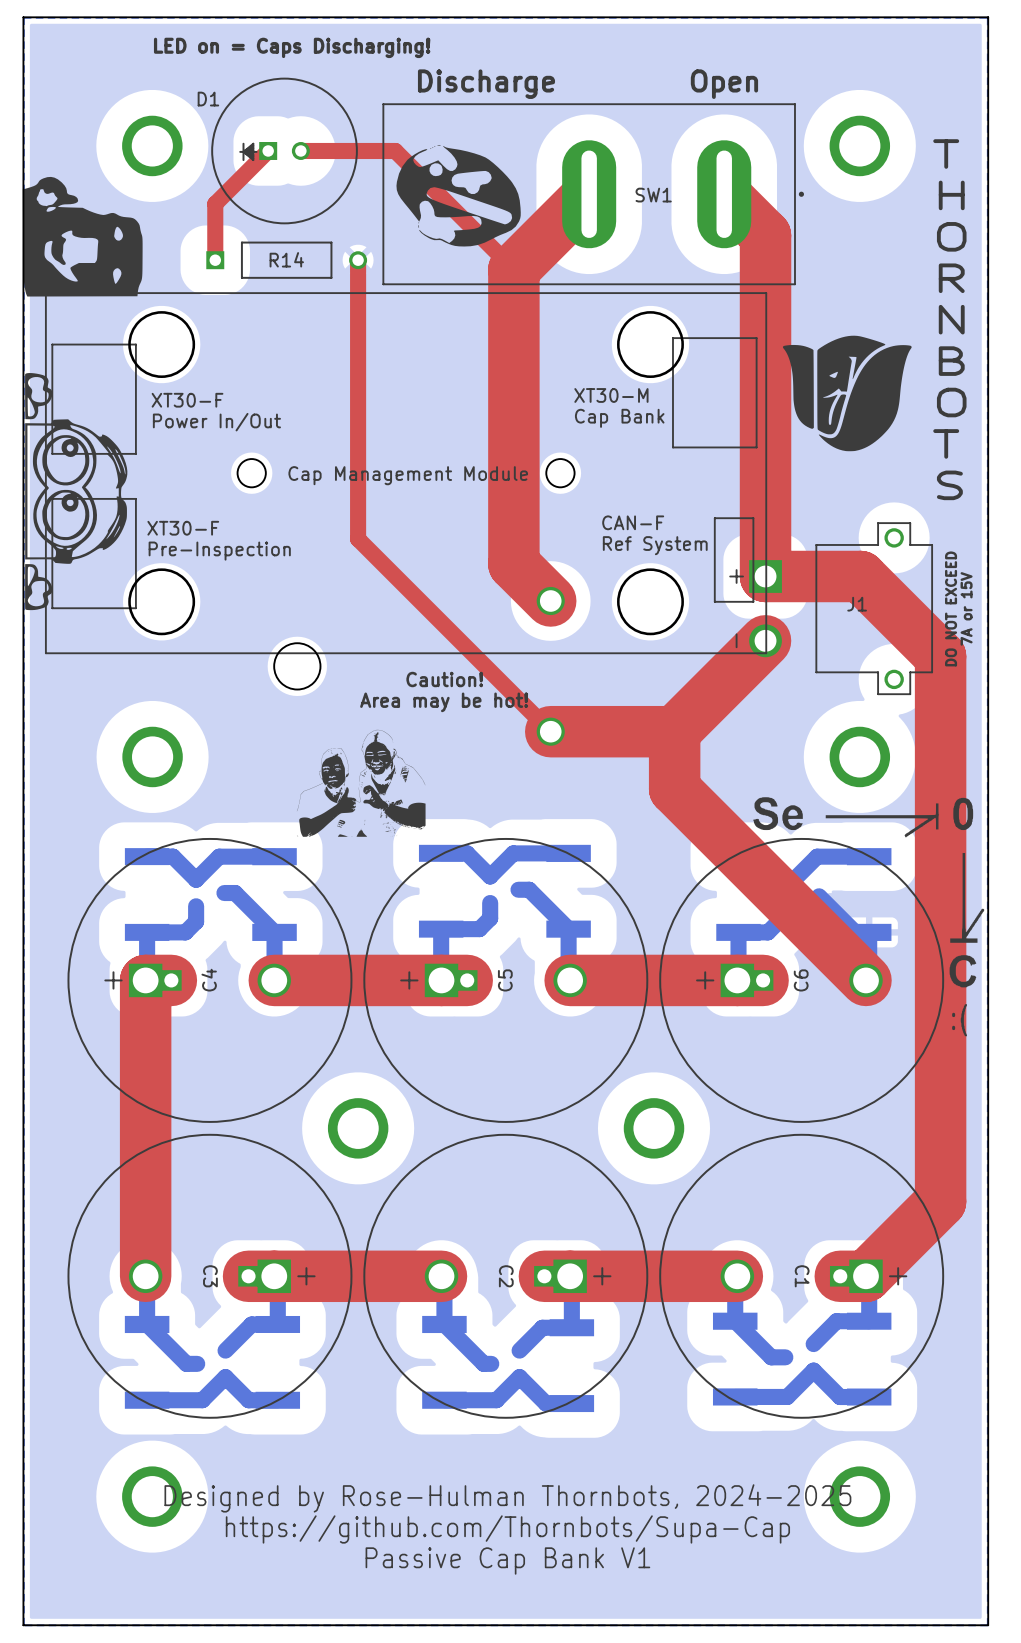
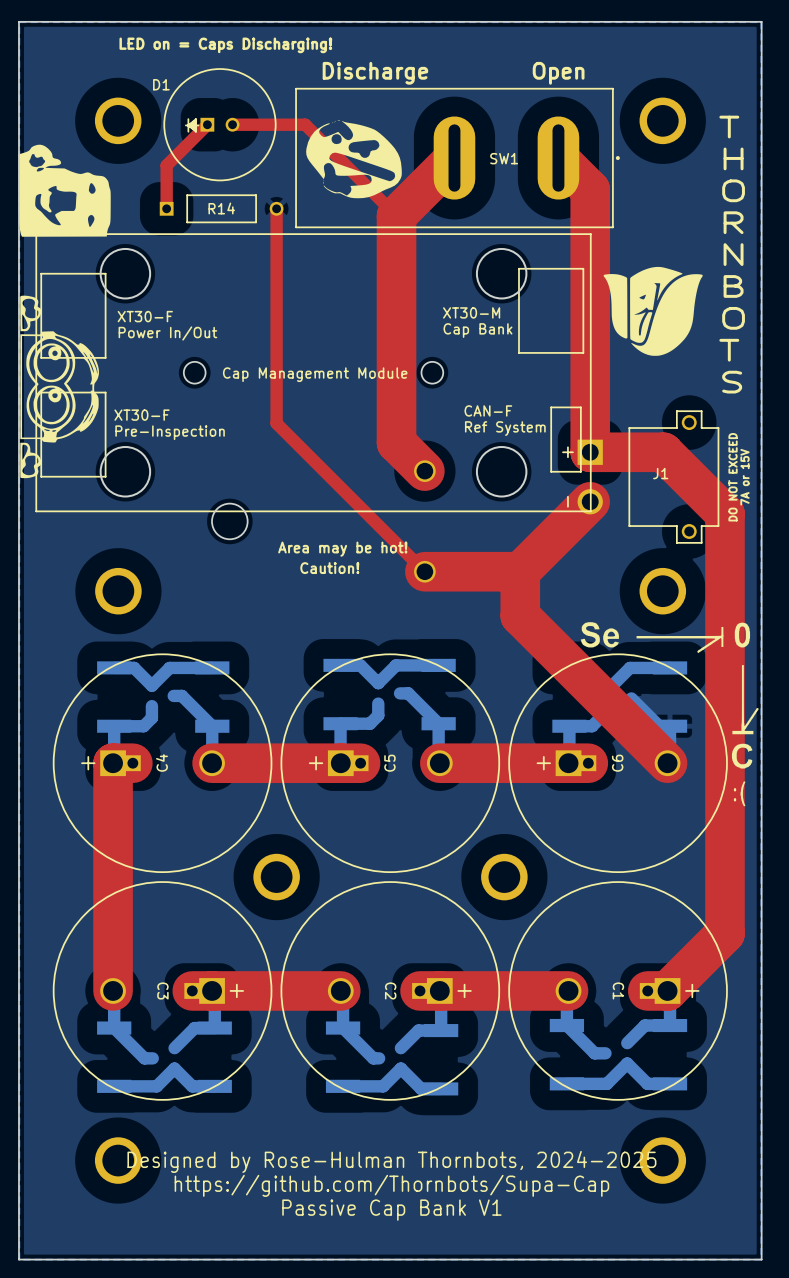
text position: Caution! (444, 679) -> Caution! (329, 568)
drawing: [296, 729, 426, 837] -> none

